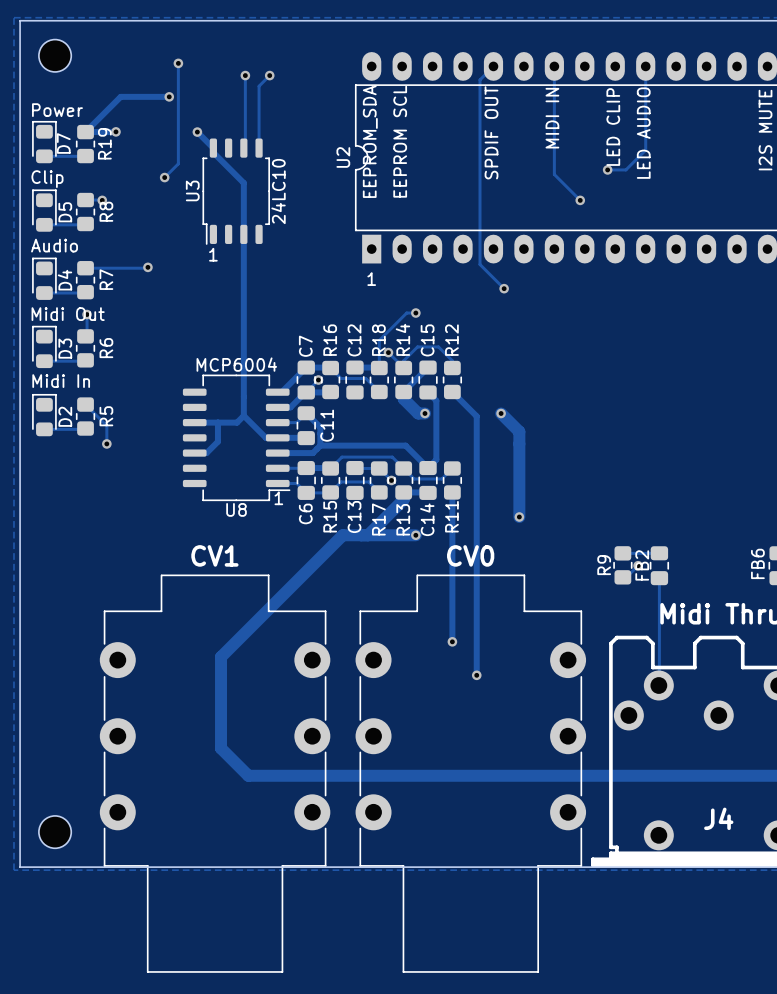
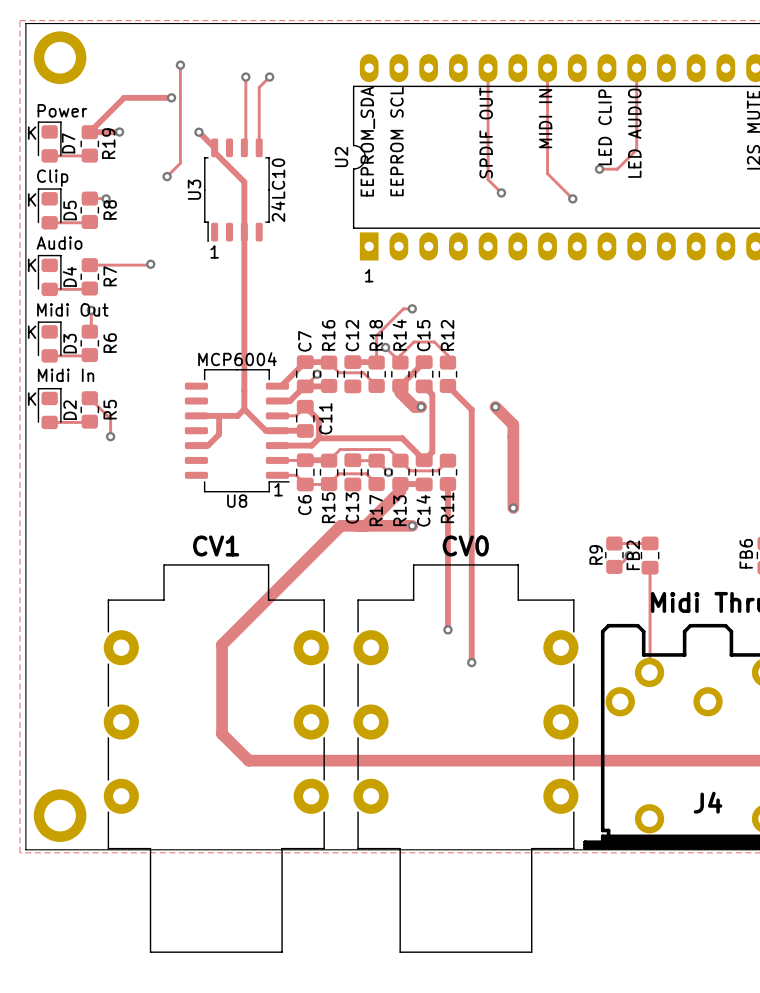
part footprint: [38, 39, 72, 72] -> [33, 31, 87, 85]
track: (493, 66) (480, 79) (480, 264) (504, 288) -> (488, 68) (488, 179) (501, 192)
text: none -> K (32, 133)
via: none -> (501, 192)
text: none -> K (32, 199)
text: none -> K (32, 265)
via: (504, 288) -> none
text: none -> K (32, 332)
text: none -> K (32, 399)
part footprint: [38, 815, 72, 849] -> [33, 789, 87, 842]

